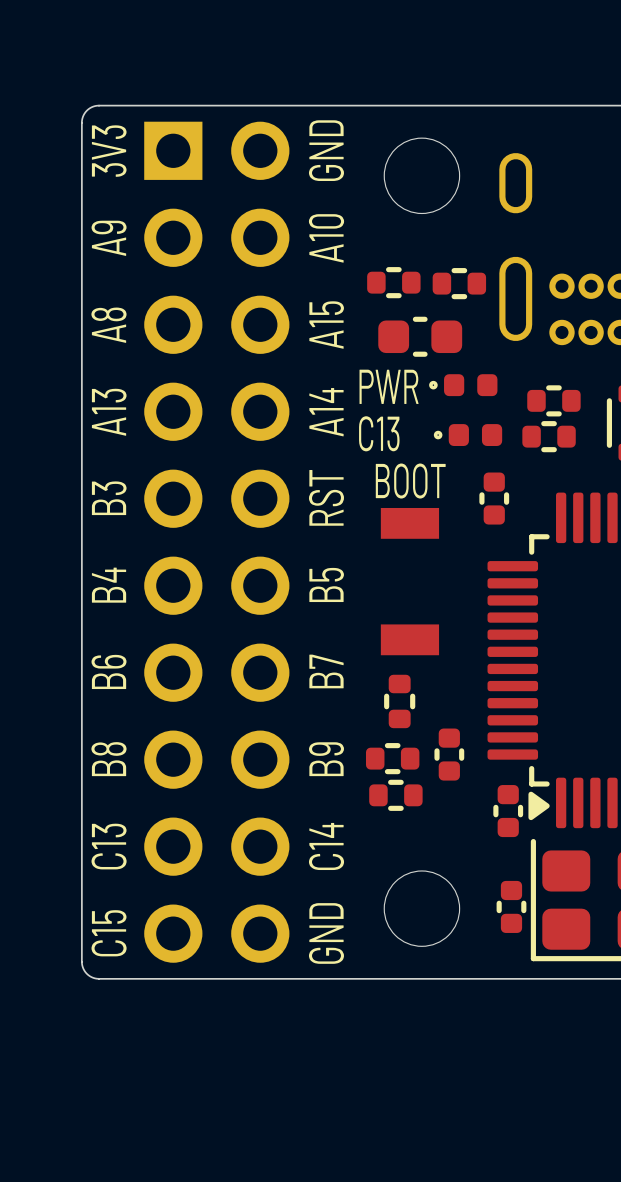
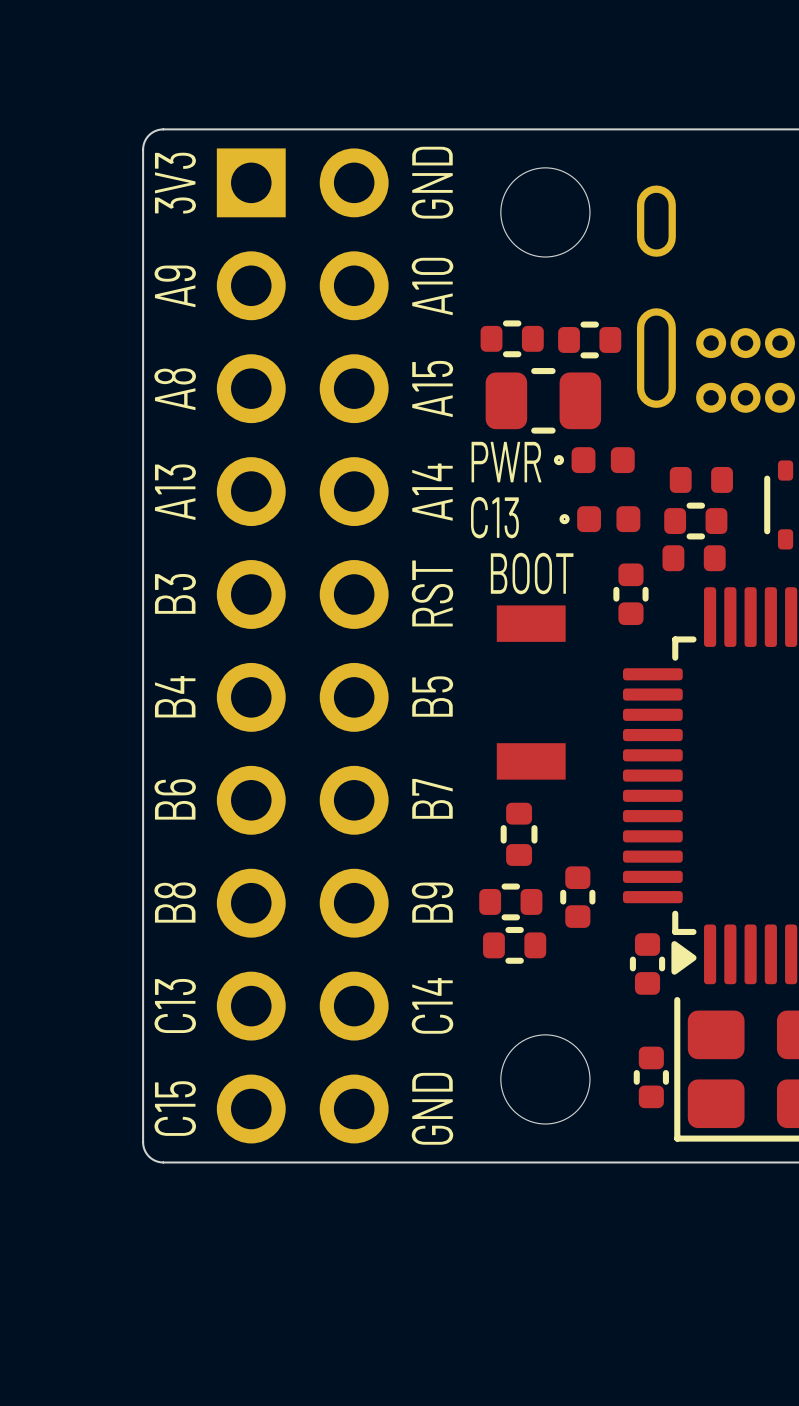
part footprint: [378, 316, 463, 357] -> [485, 368, 602, 434]
part footprint: [527, 385, 581, 417] -> [669, 466, 733, 493]
part: none -> (694, 558)

